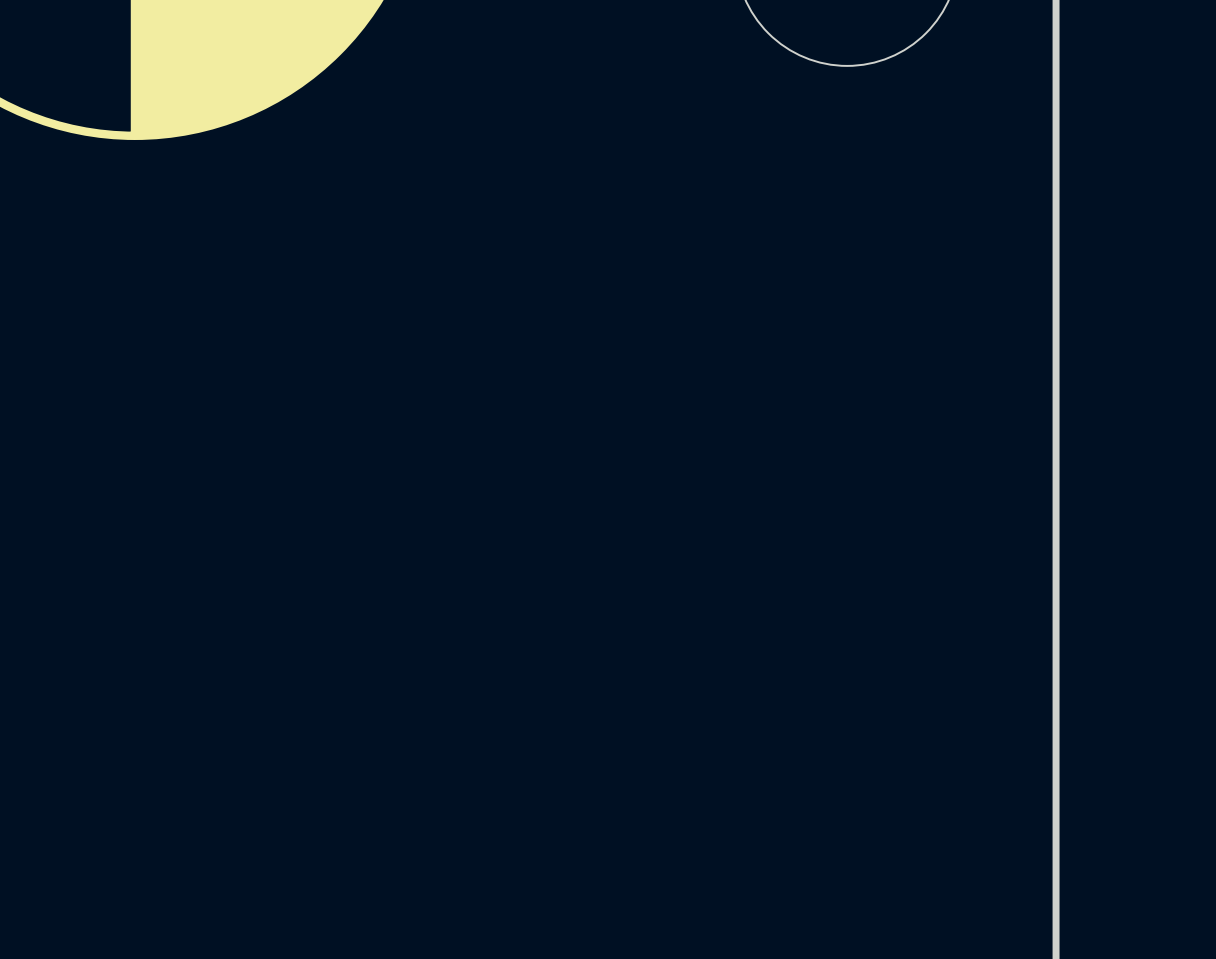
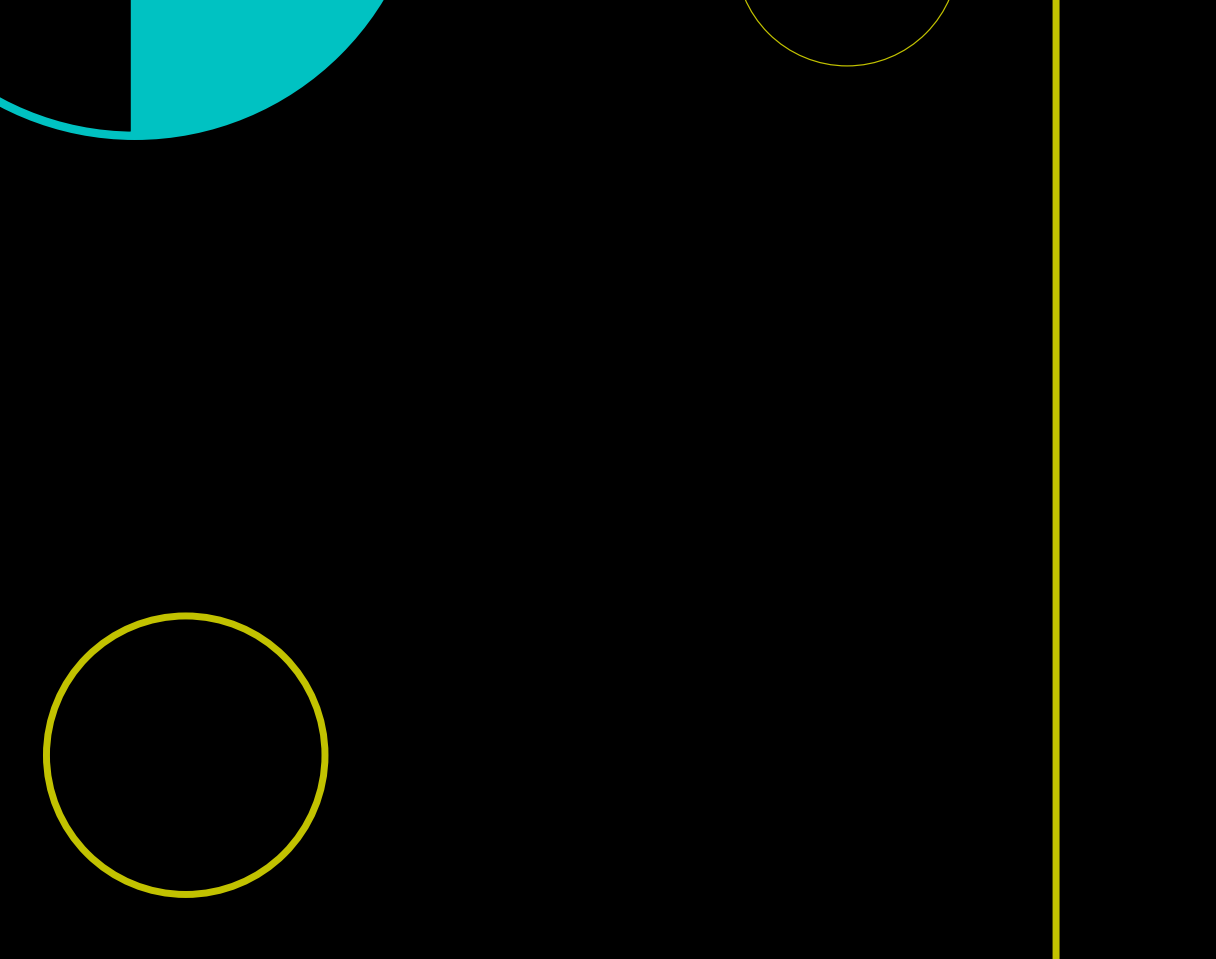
round board edge: none -> [42, 612, 329, 898]

